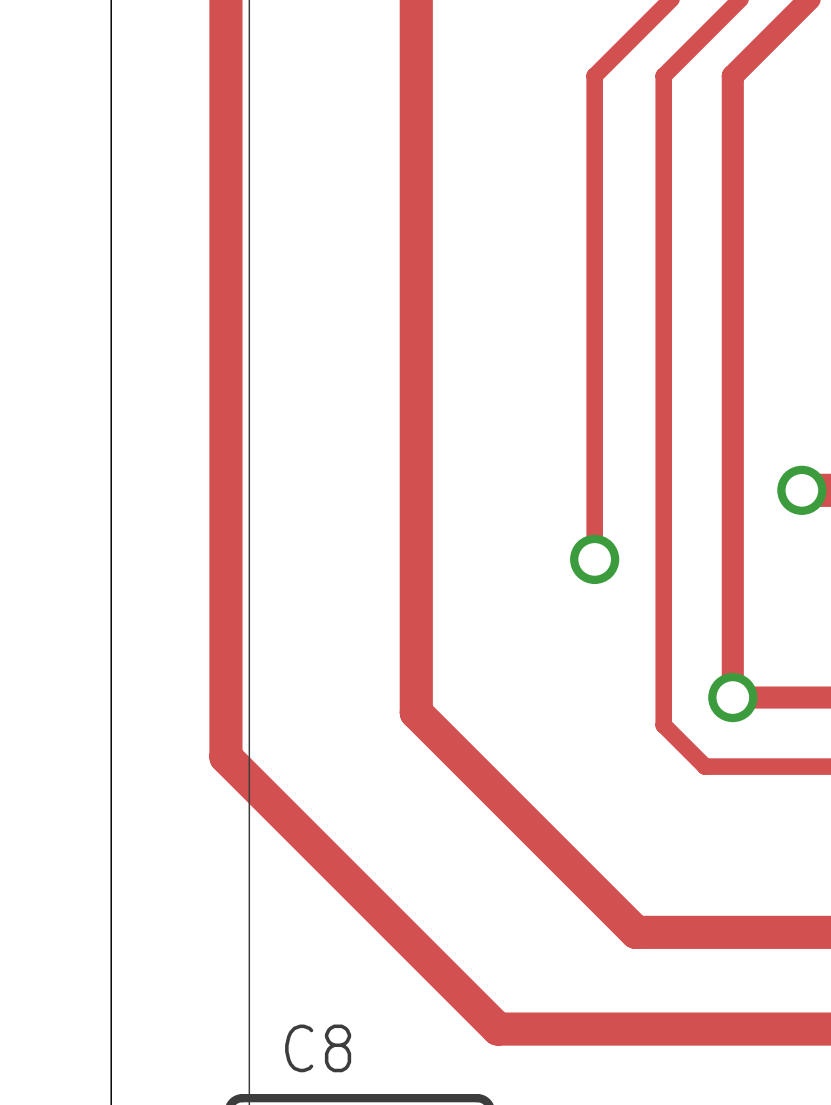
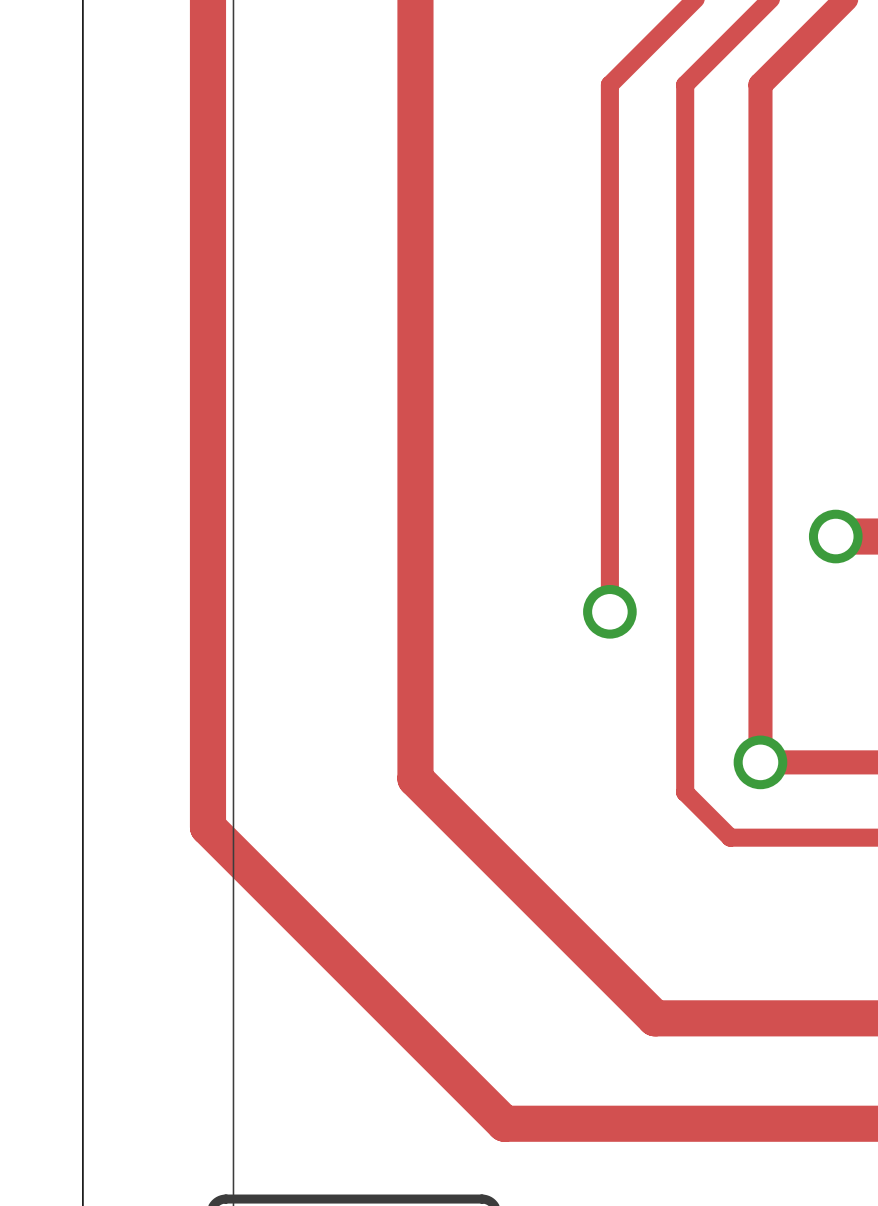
text: C8 (318, 1048) -> none

